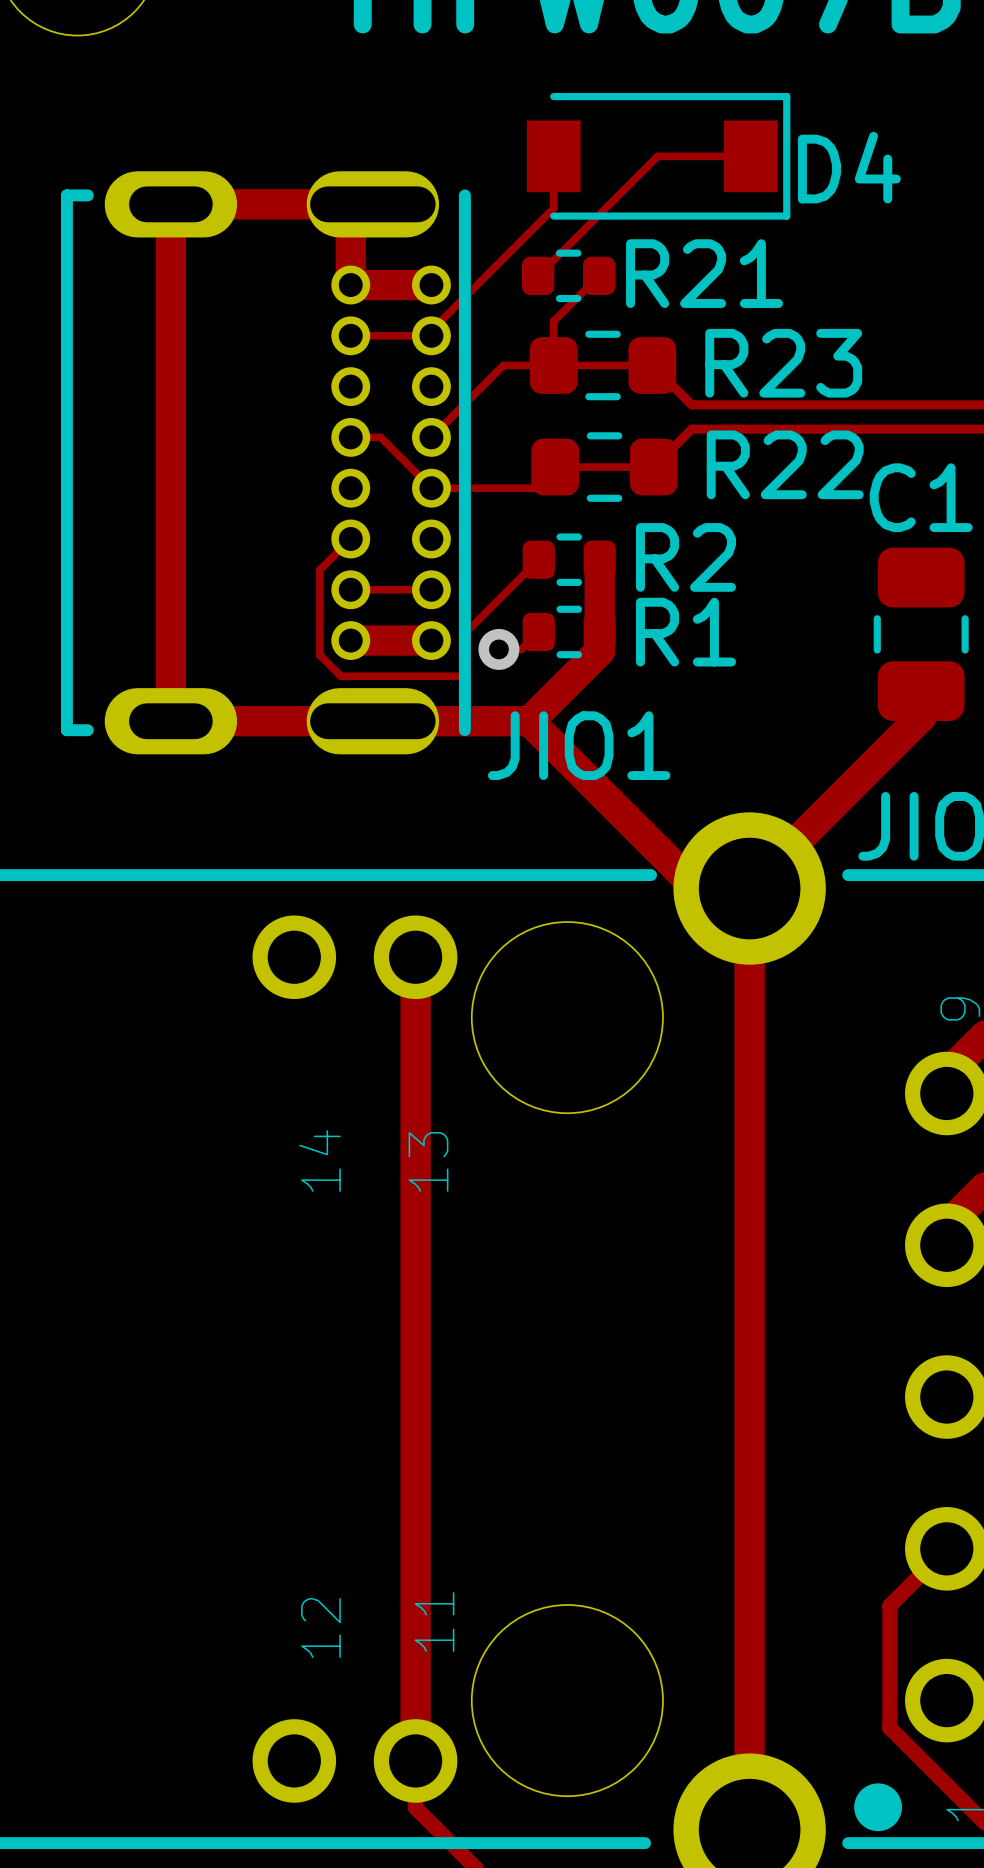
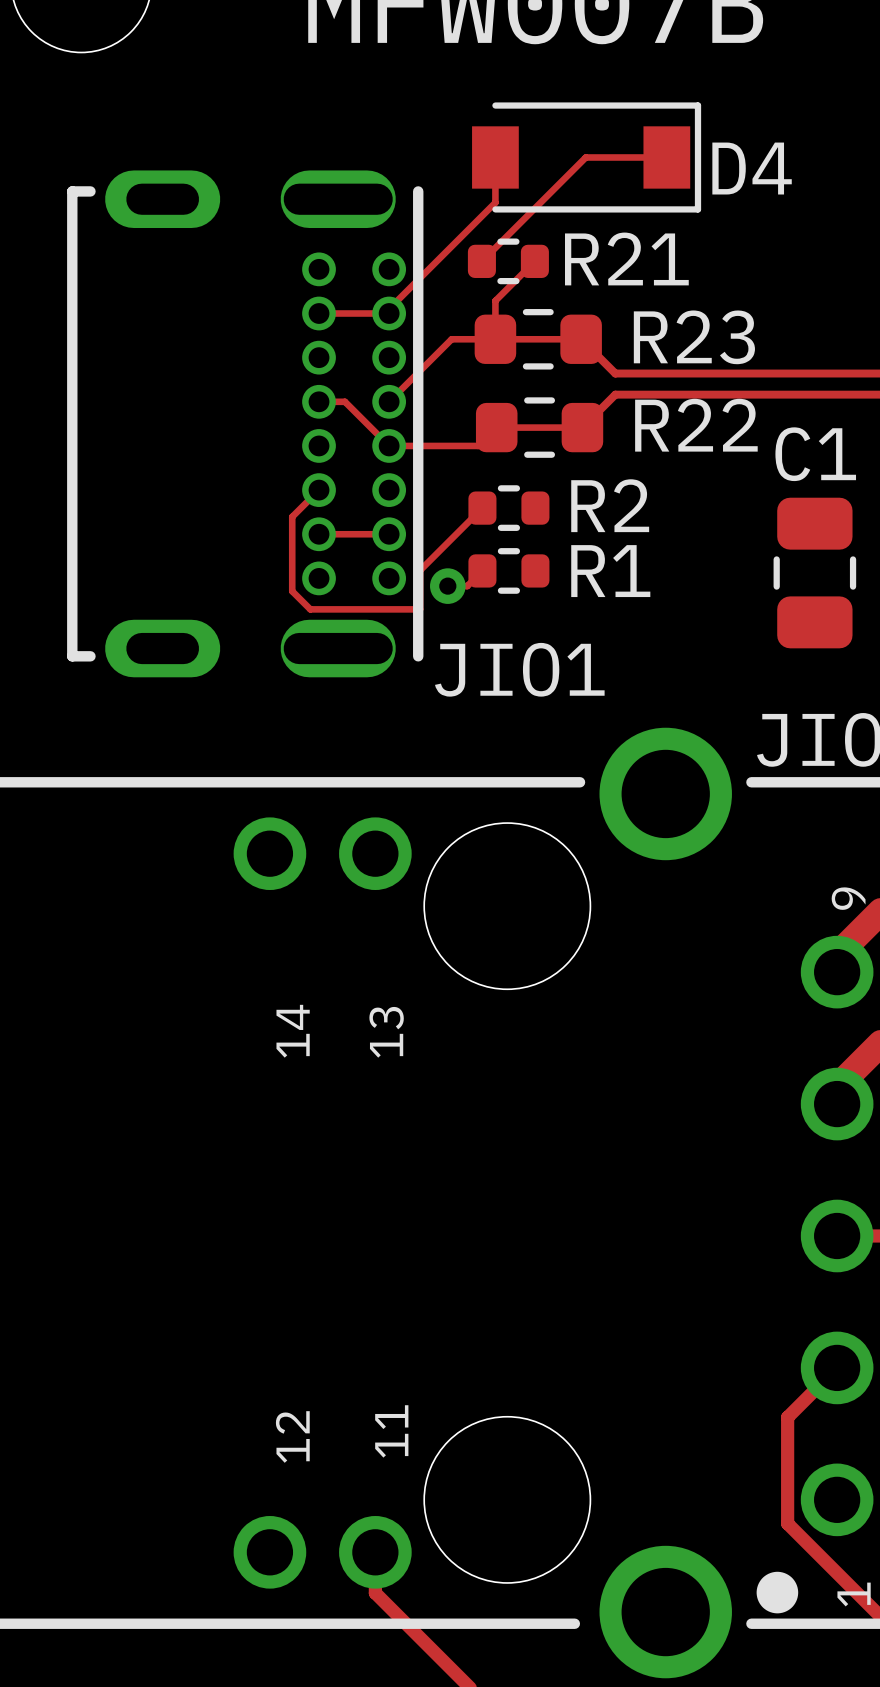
track: (431, 285) (350, 285) (350, 226) (372, 204) (170, 204) (170, 721) (529, 721) -> none
track: (599, 559) (599, 651) (529, 721) -> none
track: (350, 640) (431, 640) -> none
track: (921, 691) (921, 716) (749, 888) -> none
track: (529, 721) (696, 888) (749, 888) -> none
track: (749, 888) (749, 1829) -> none
track: (415, 957) (415, 1760) -> none

